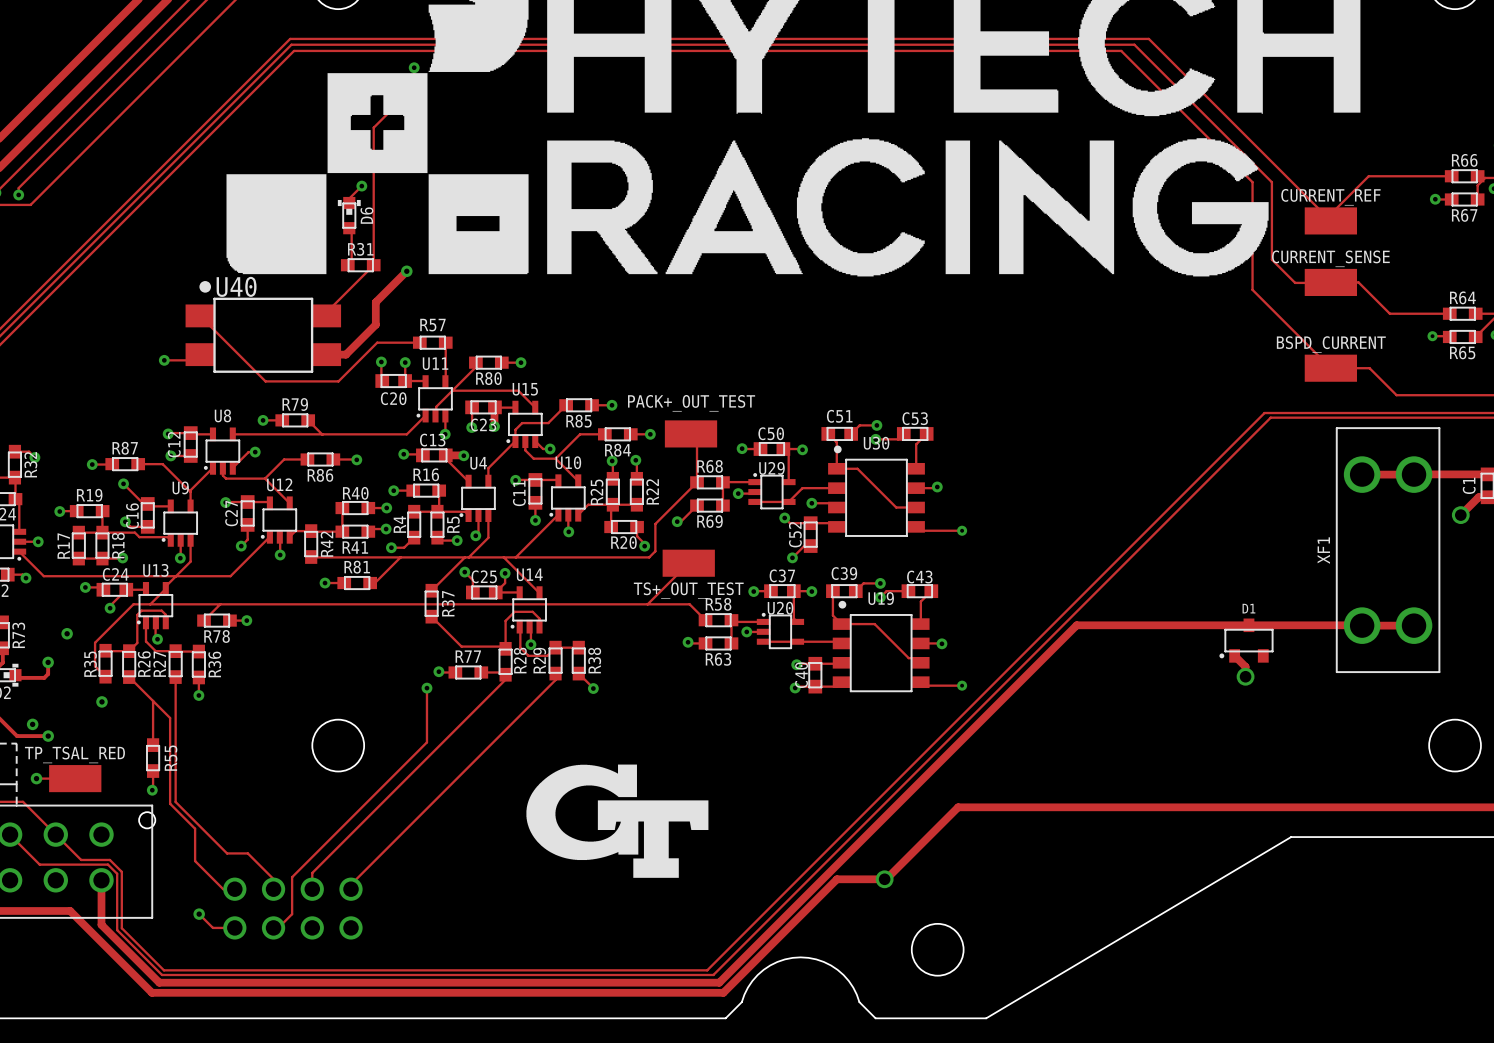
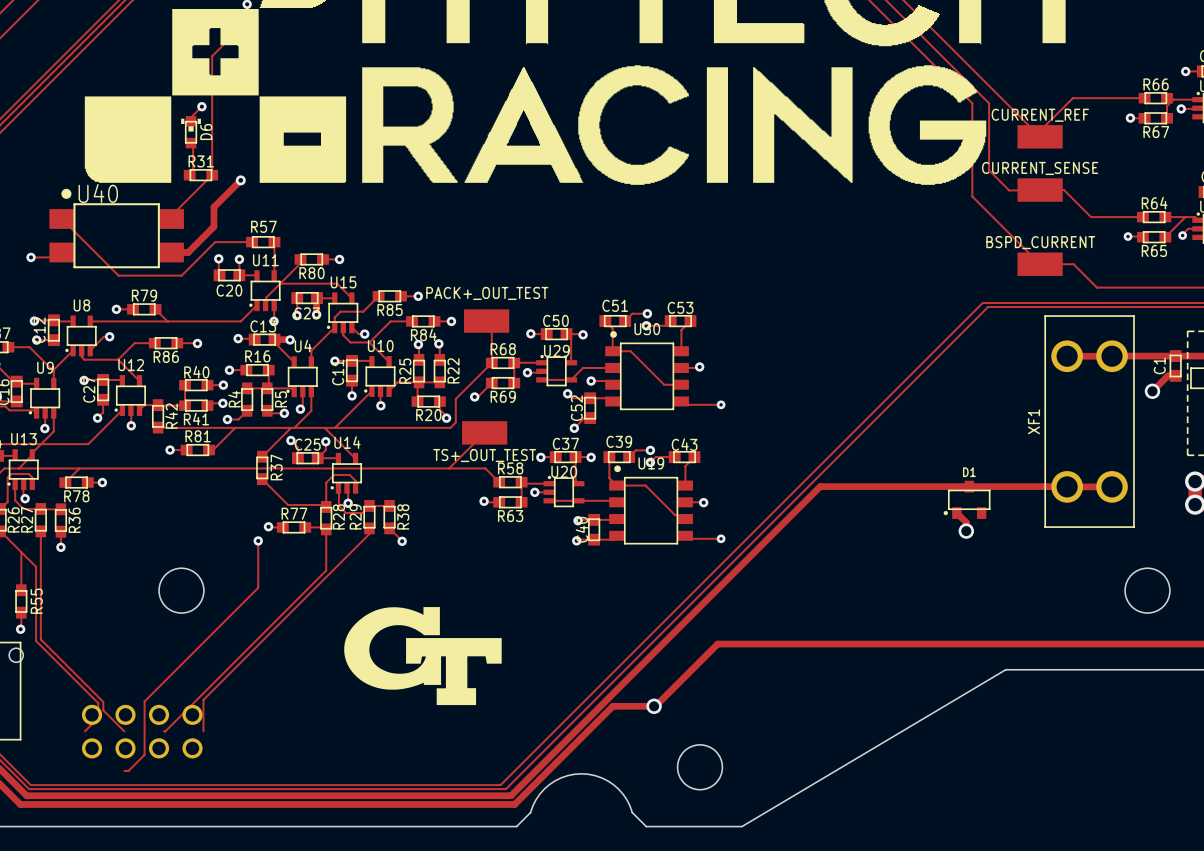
track: (505, 679) (312, 872) (312, 889) -> (326, 533) (326, 570) (163, 731)
track: (195, 828) (195, 861) (223, 889) (234, 889) -> (57, 662) (98, 703) (98, 718) (84, 731)
track: (227, 853) (247, 853) (273, 879) (273, 889) -> (85, 683) (103, 701) (103, 710) (124, 731)
track: (363, 871) (351, 884) (351, 889) -> (203, 699) (203, 731)
track: (295, 873) (292, 877) (292, 914) (278, 927) (273, 927) -> (144, 701) (144, 754) (128, 770) (124, 770)
track: (199, 914) (212, 927) (234, 927) -> none
via: (199, 914) -> none

